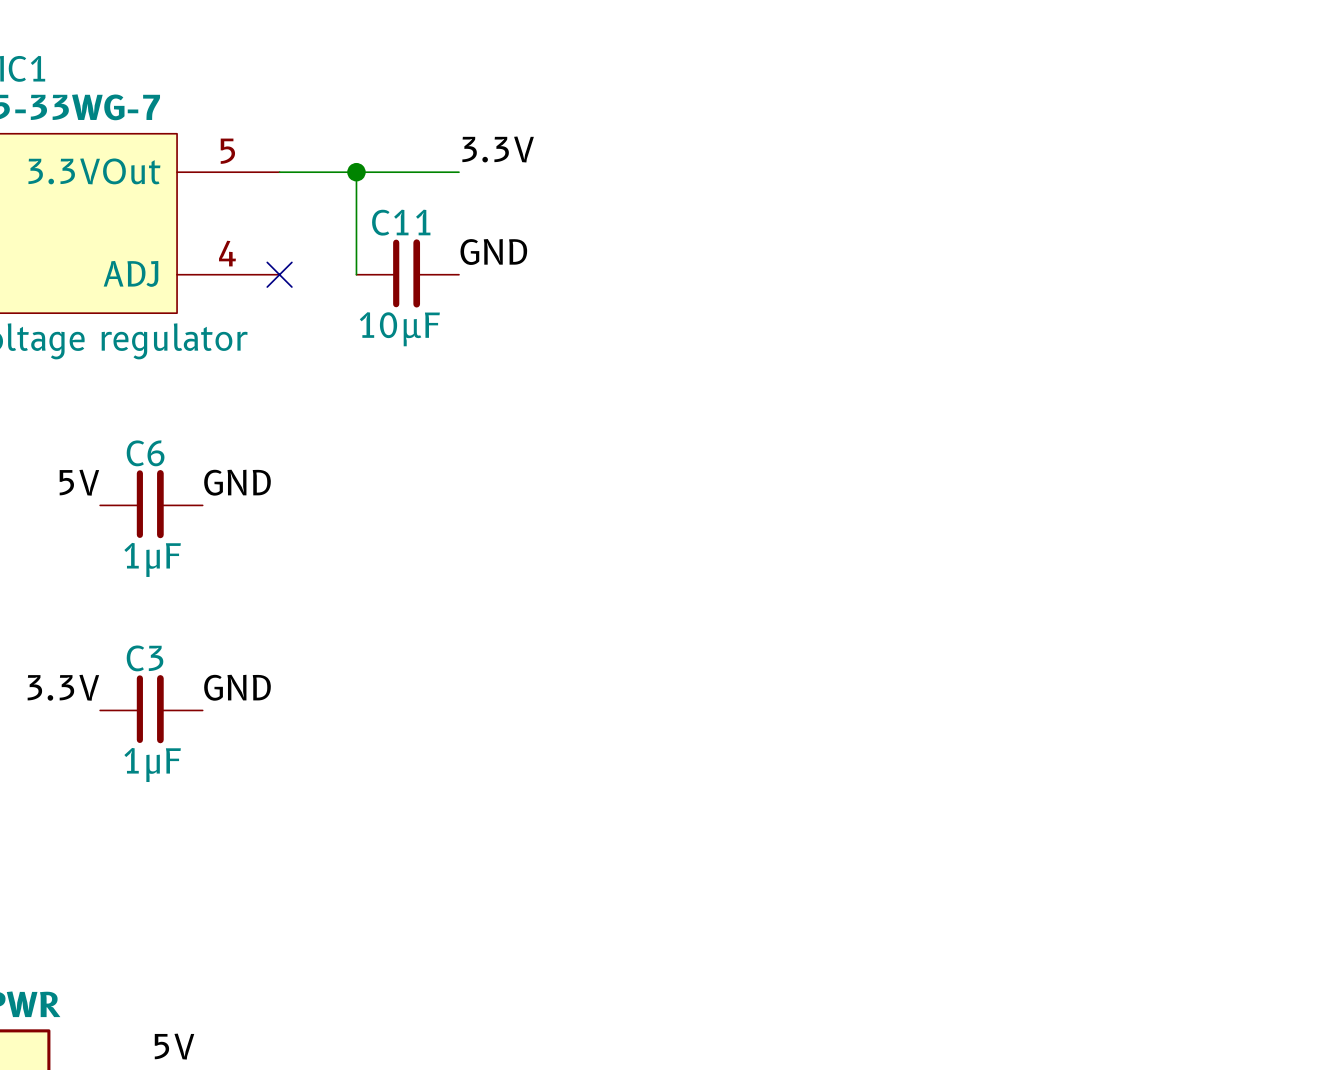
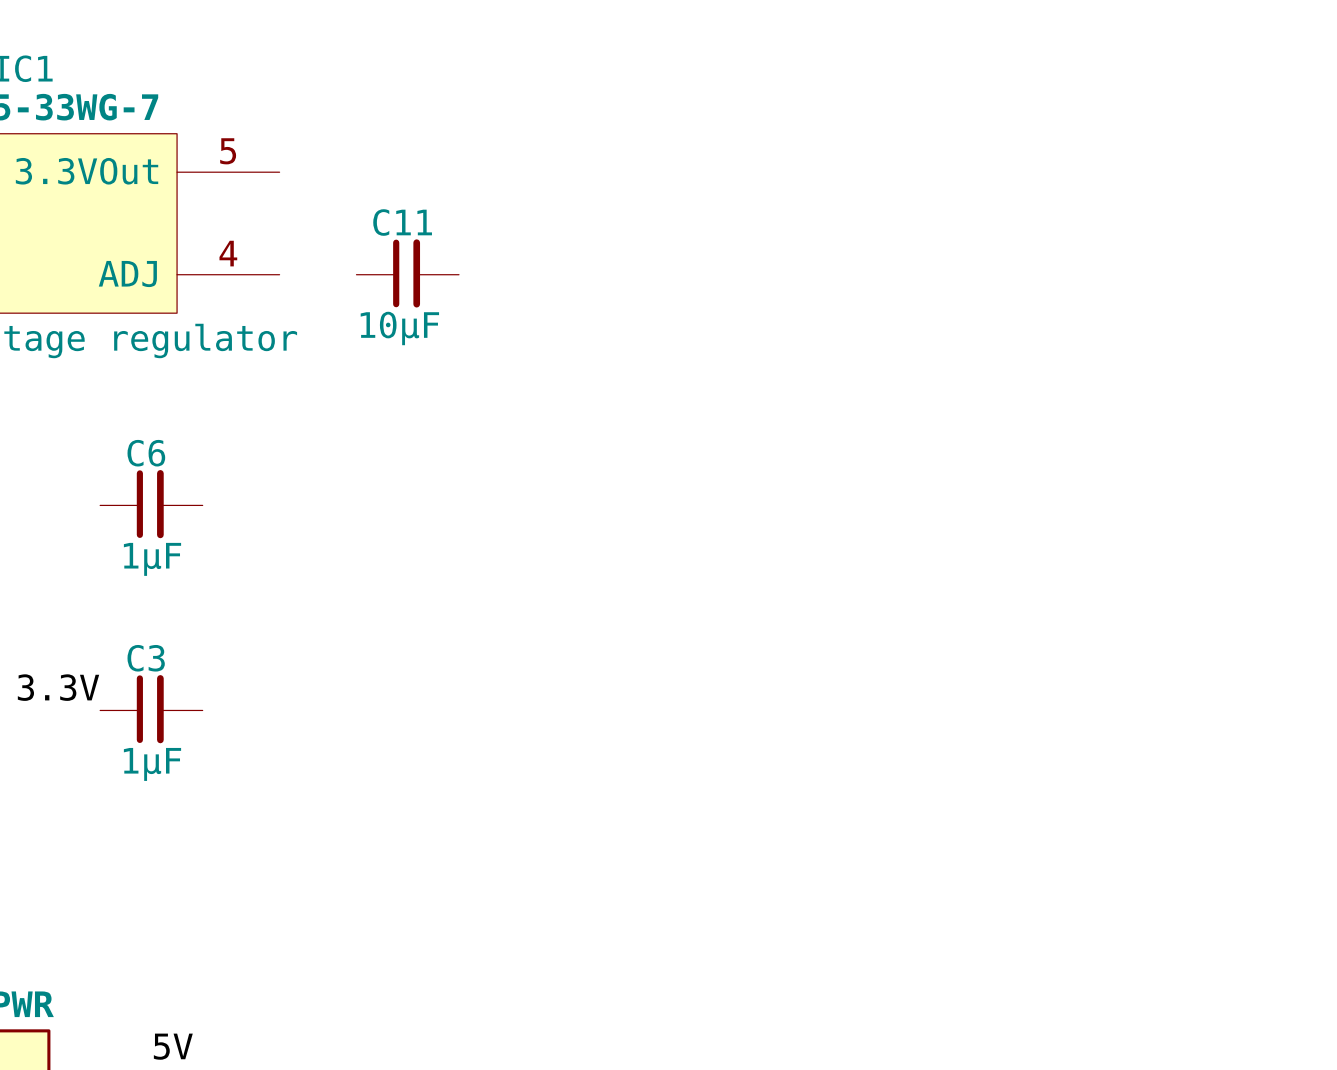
label: 3.3V (498, 149) -> none
wire: (279, 172) (459, 172) -> none
wire: (356, 172) (356, 274) -> none
junction: (356, 172) -> none
label: GND (493, 251) -> none
no-connect mark: (279, 274) -> none
label: 5V (79, 482) -> none
label: GND (237, 482) -> none
label: GND (237, 687) -> none

